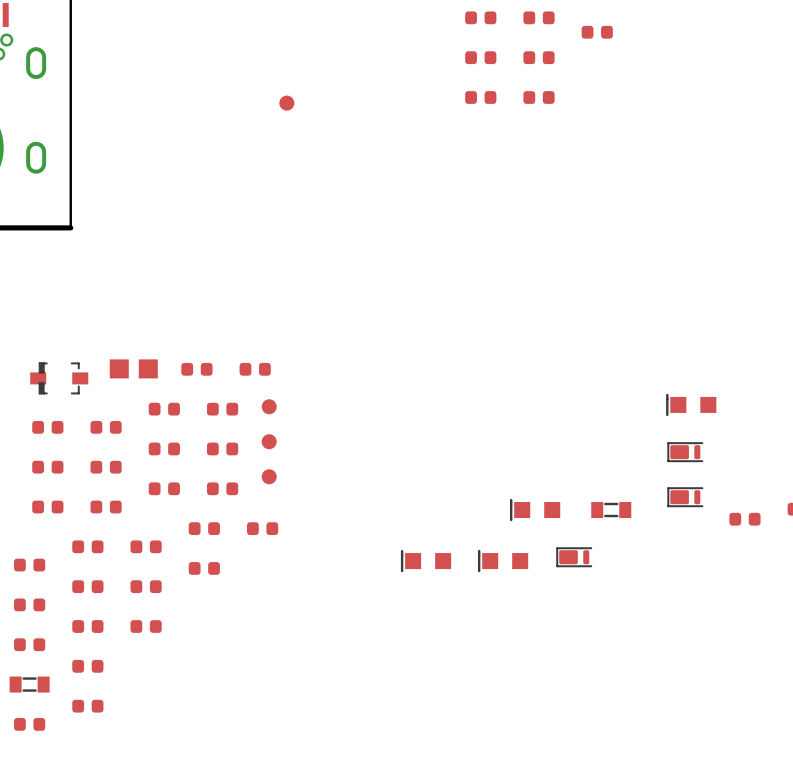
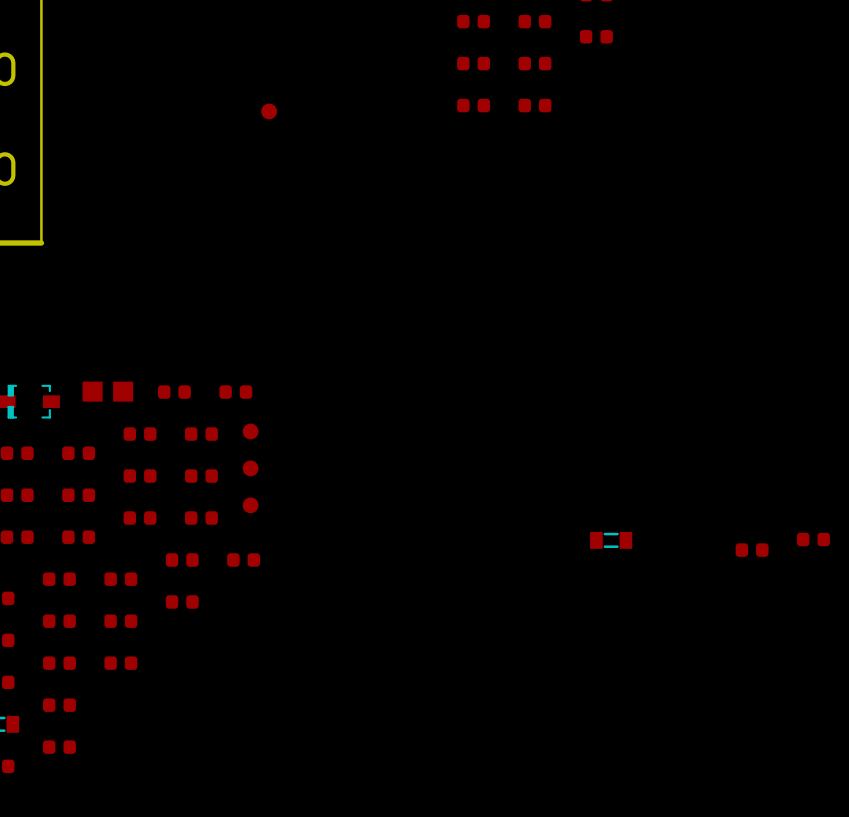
part: (691, 404) -> none
part: (685, 452) -> none
part: (685, 497) -> none
part: (535, 510) -> none
part: (574, 557) -> none
part: (426, 561) -> none
part: (503, 561) -> none

